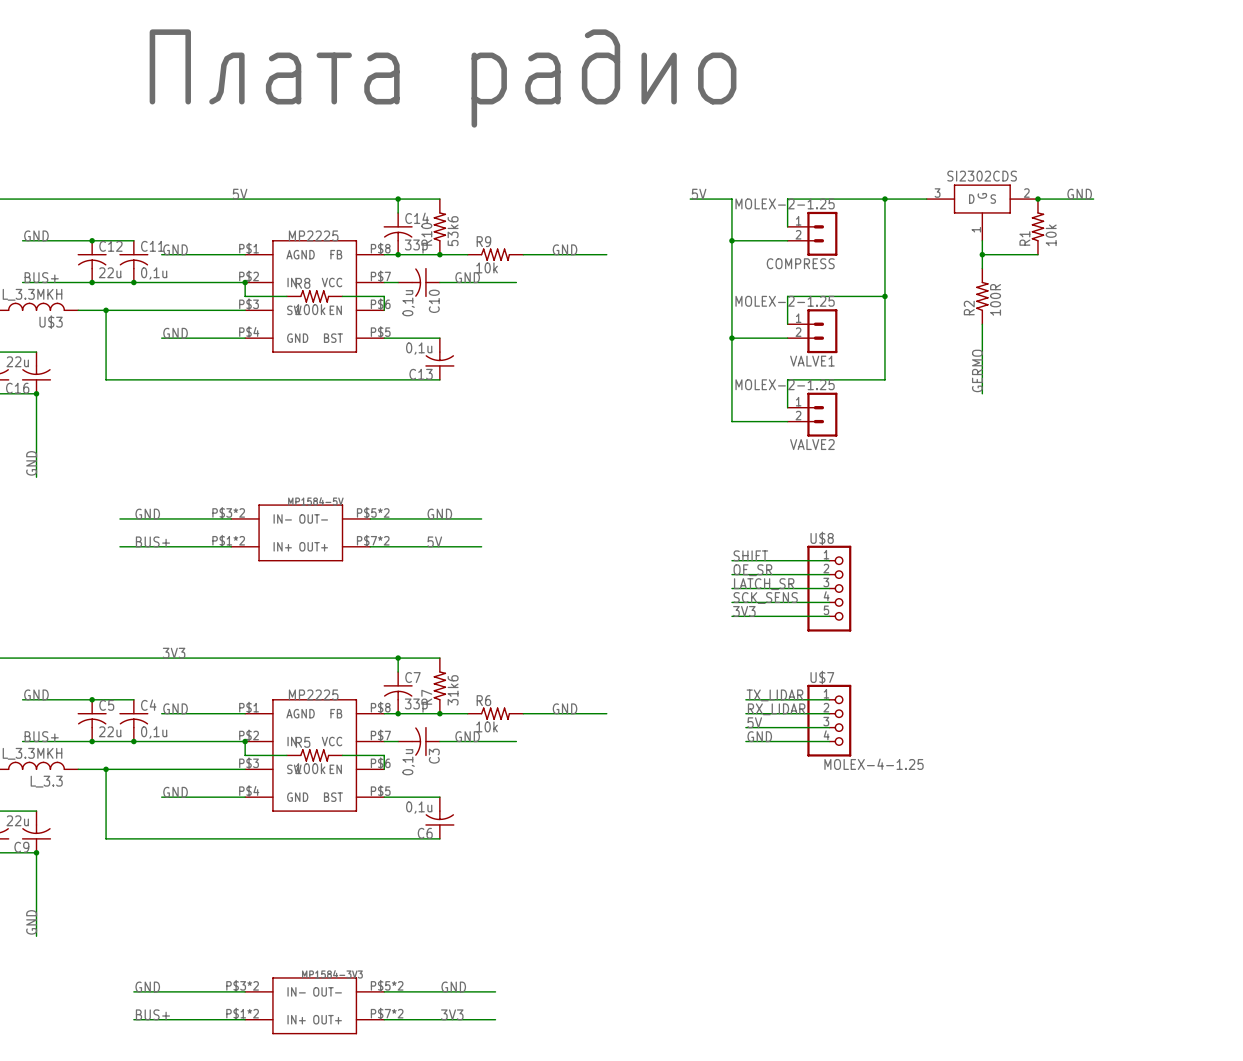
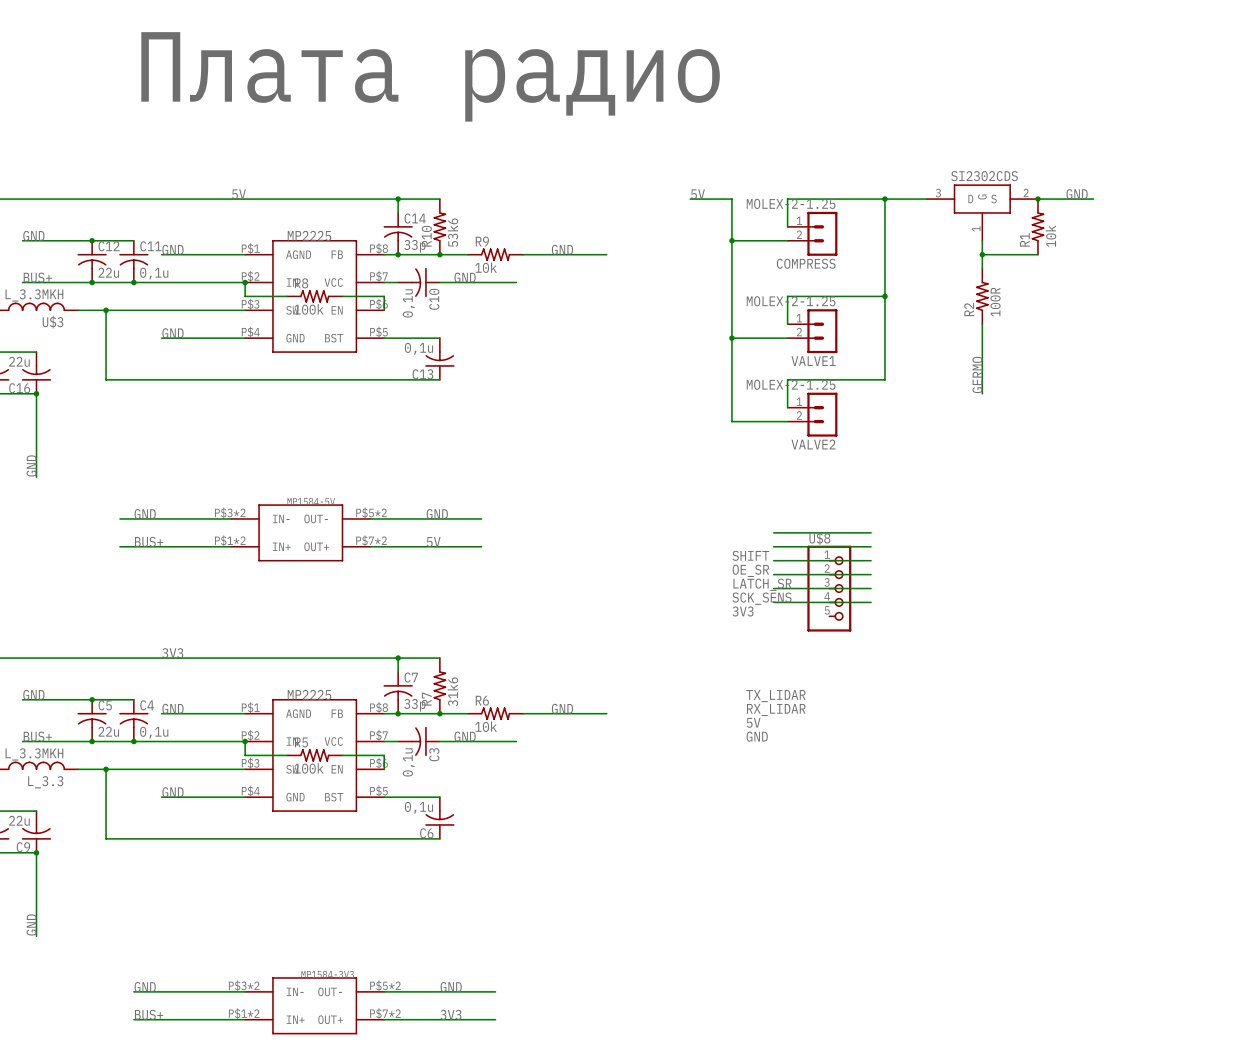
wire: none -> (773, 532) (871, 532)
wire: (731, 560) (773, 560) -> (829, 560) (871, 560)
wire: (731, 574) (773, 574) -> (829, 574) (871, 574)
wire: (731, 588) (773, 588) -> (829, 588) (871, 588)
wire: (731, 602) (773, 602) -> (829, 602) (871, 602)
wire: (731, 616) (829, 616) -> (773, 546) (871, 546)
wire: (745, 699) (829, 699) -> none
wire: (745, 713) (829, 713) -> none
U$7: MOLEX-4-1.25 (829, 720) -> none
wire: (745, 727) (829, 727) -> none
wire: (745, 741) (829, 741) -> none

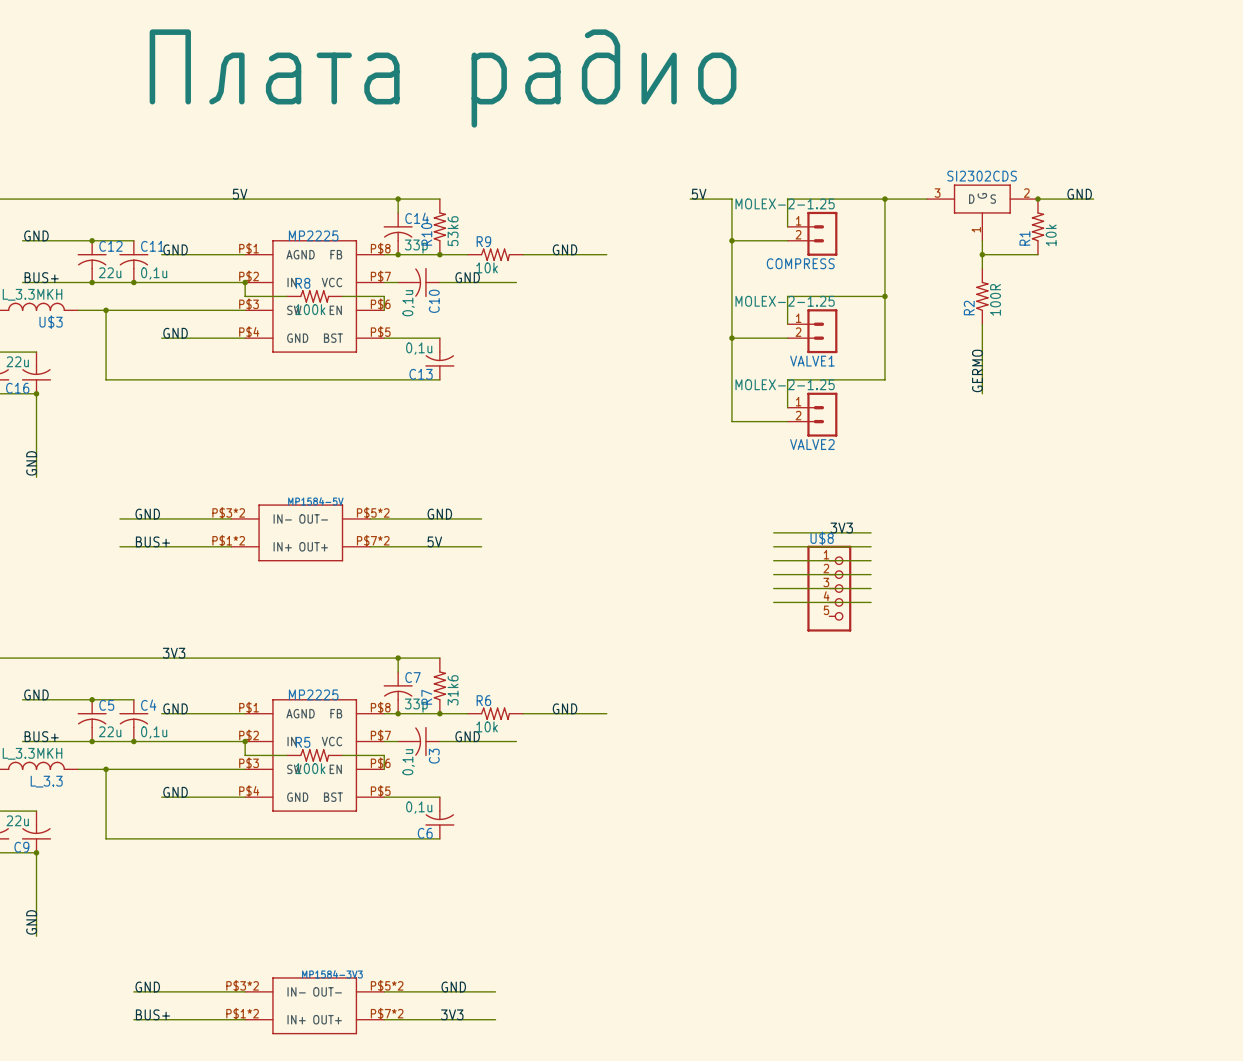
label: SHIFT (750, 555) -> none
label: OE_SR (750, 570) -> none
label: LATCH_SR (762, 584) -> none
label: SCK_SENS (762, 598) -> none
label position: 3V3 (743, 611) -> 3V3 (841, 528)
label: TX_LIDAR (775, 696) -> none
label: RX_LIDAR (776, 710) -> none
label: 5V (753, 722) -> none
label: GND (757, 736) -> none

